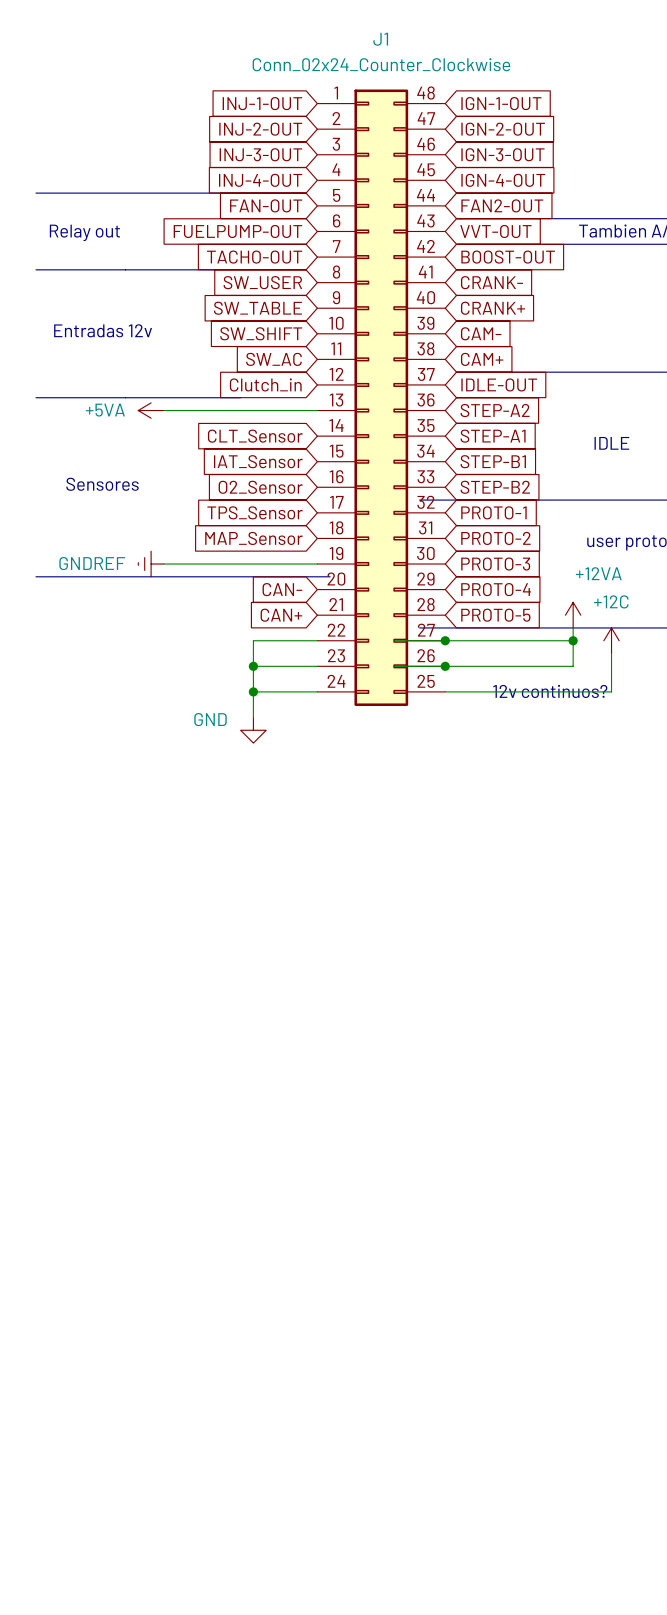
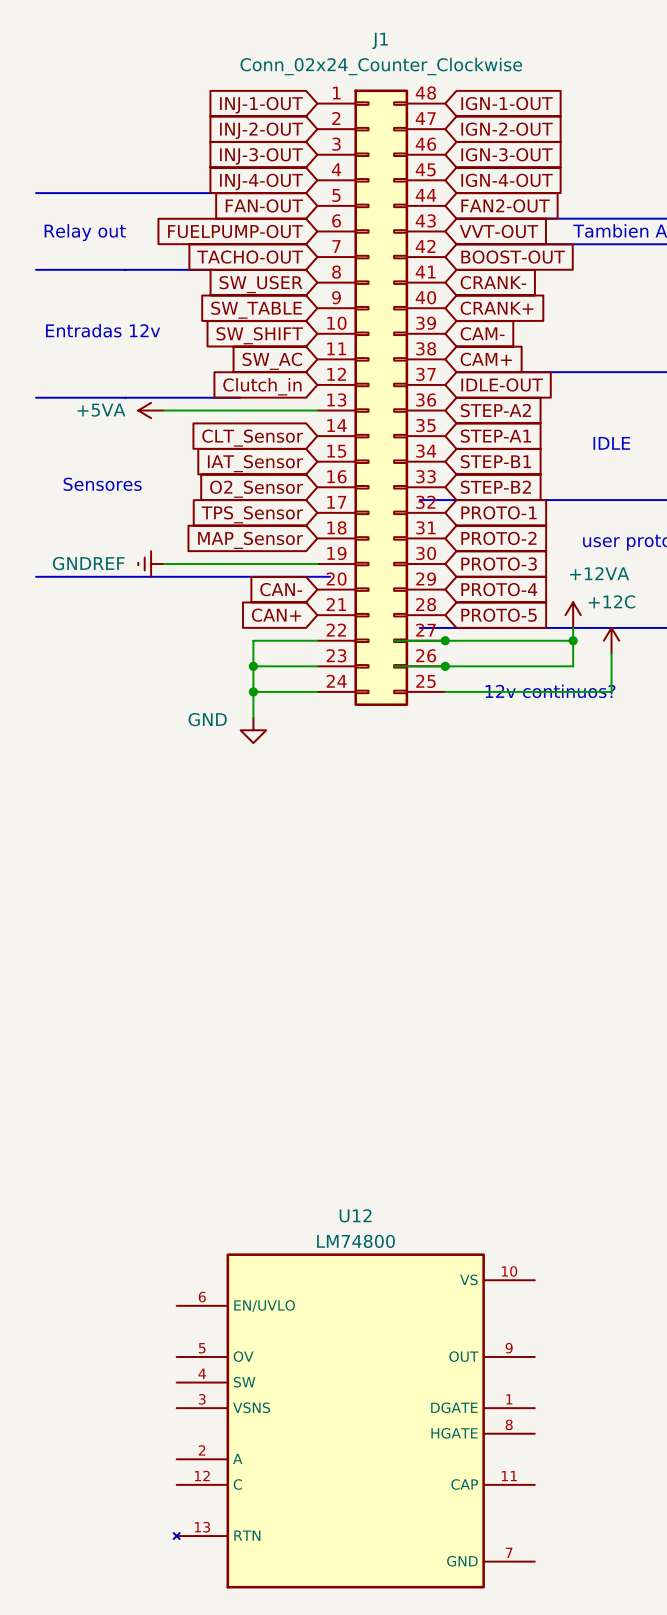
U12: none -> LM74800 (354, 1420)

